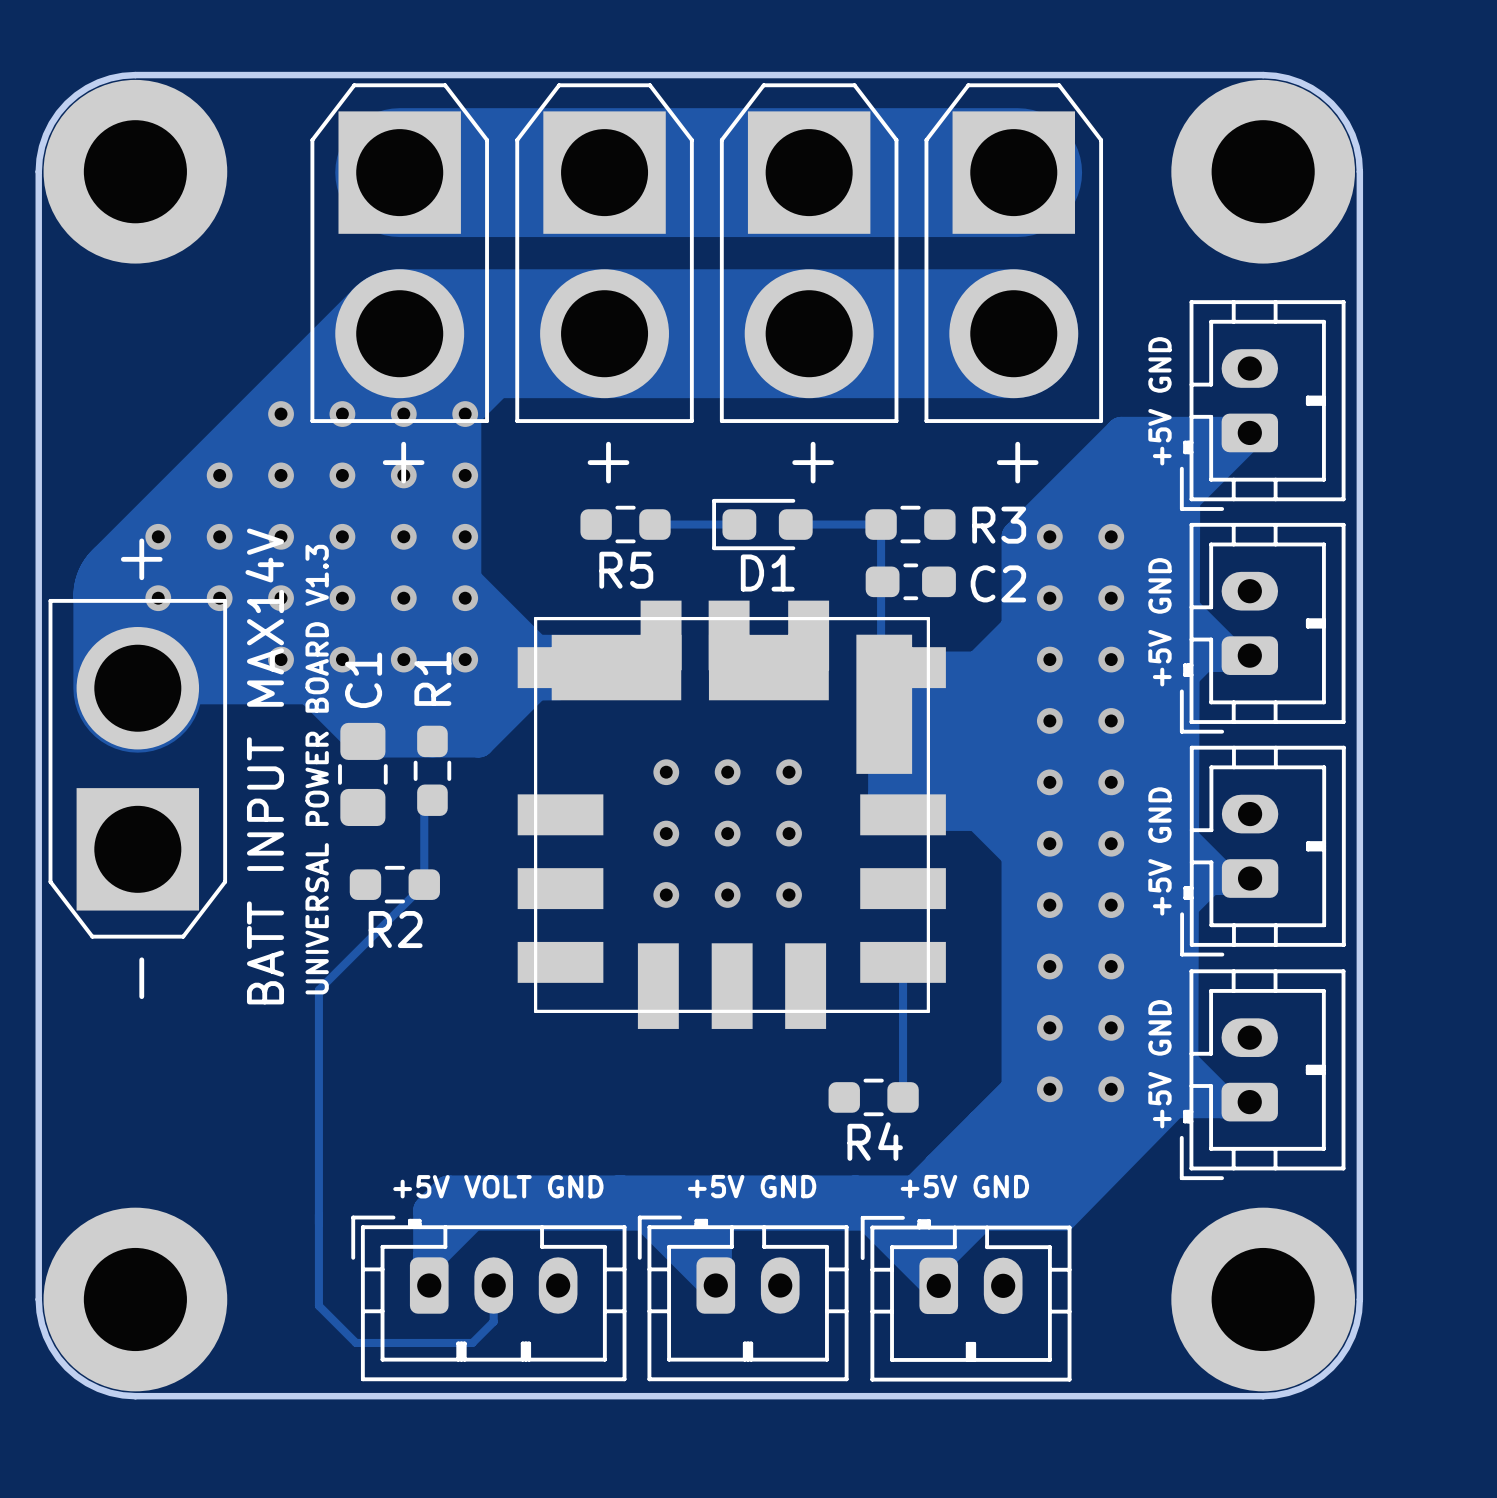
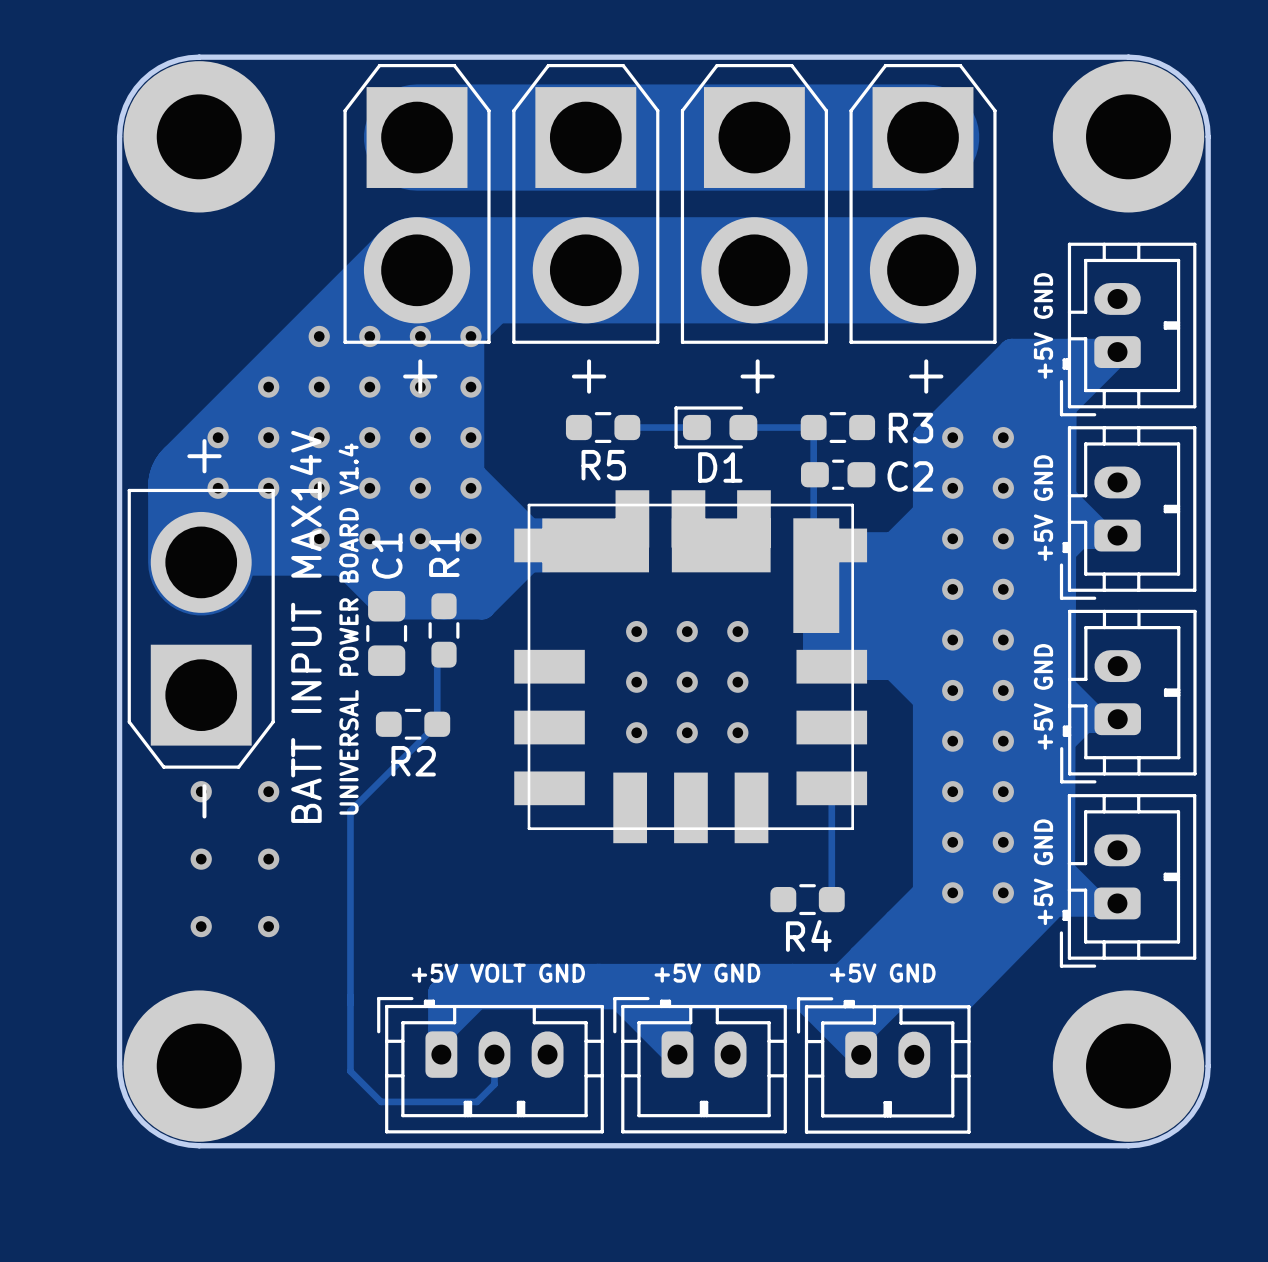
text: UNIVERSAL POWER BOARD V1.3 (317, 769) -> UNIVERSAL POWER BOARD V1.4 (348, 629)
via: none -> (201, 791)
via: none -> (268, 791)
via: none -> (201, 859)
via: none -> (268, 859)
via: none -> (201, 926)
via: none -> (268, 926)

